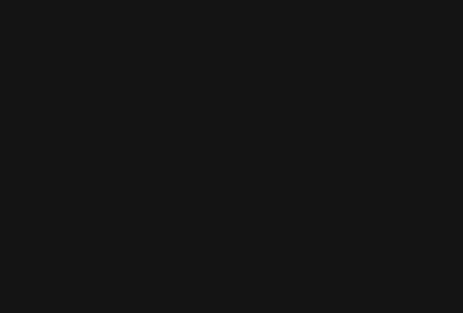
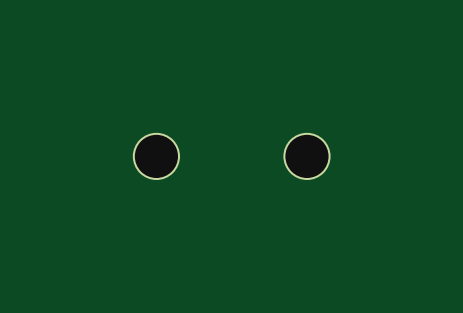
part: none -> (231, 156)

